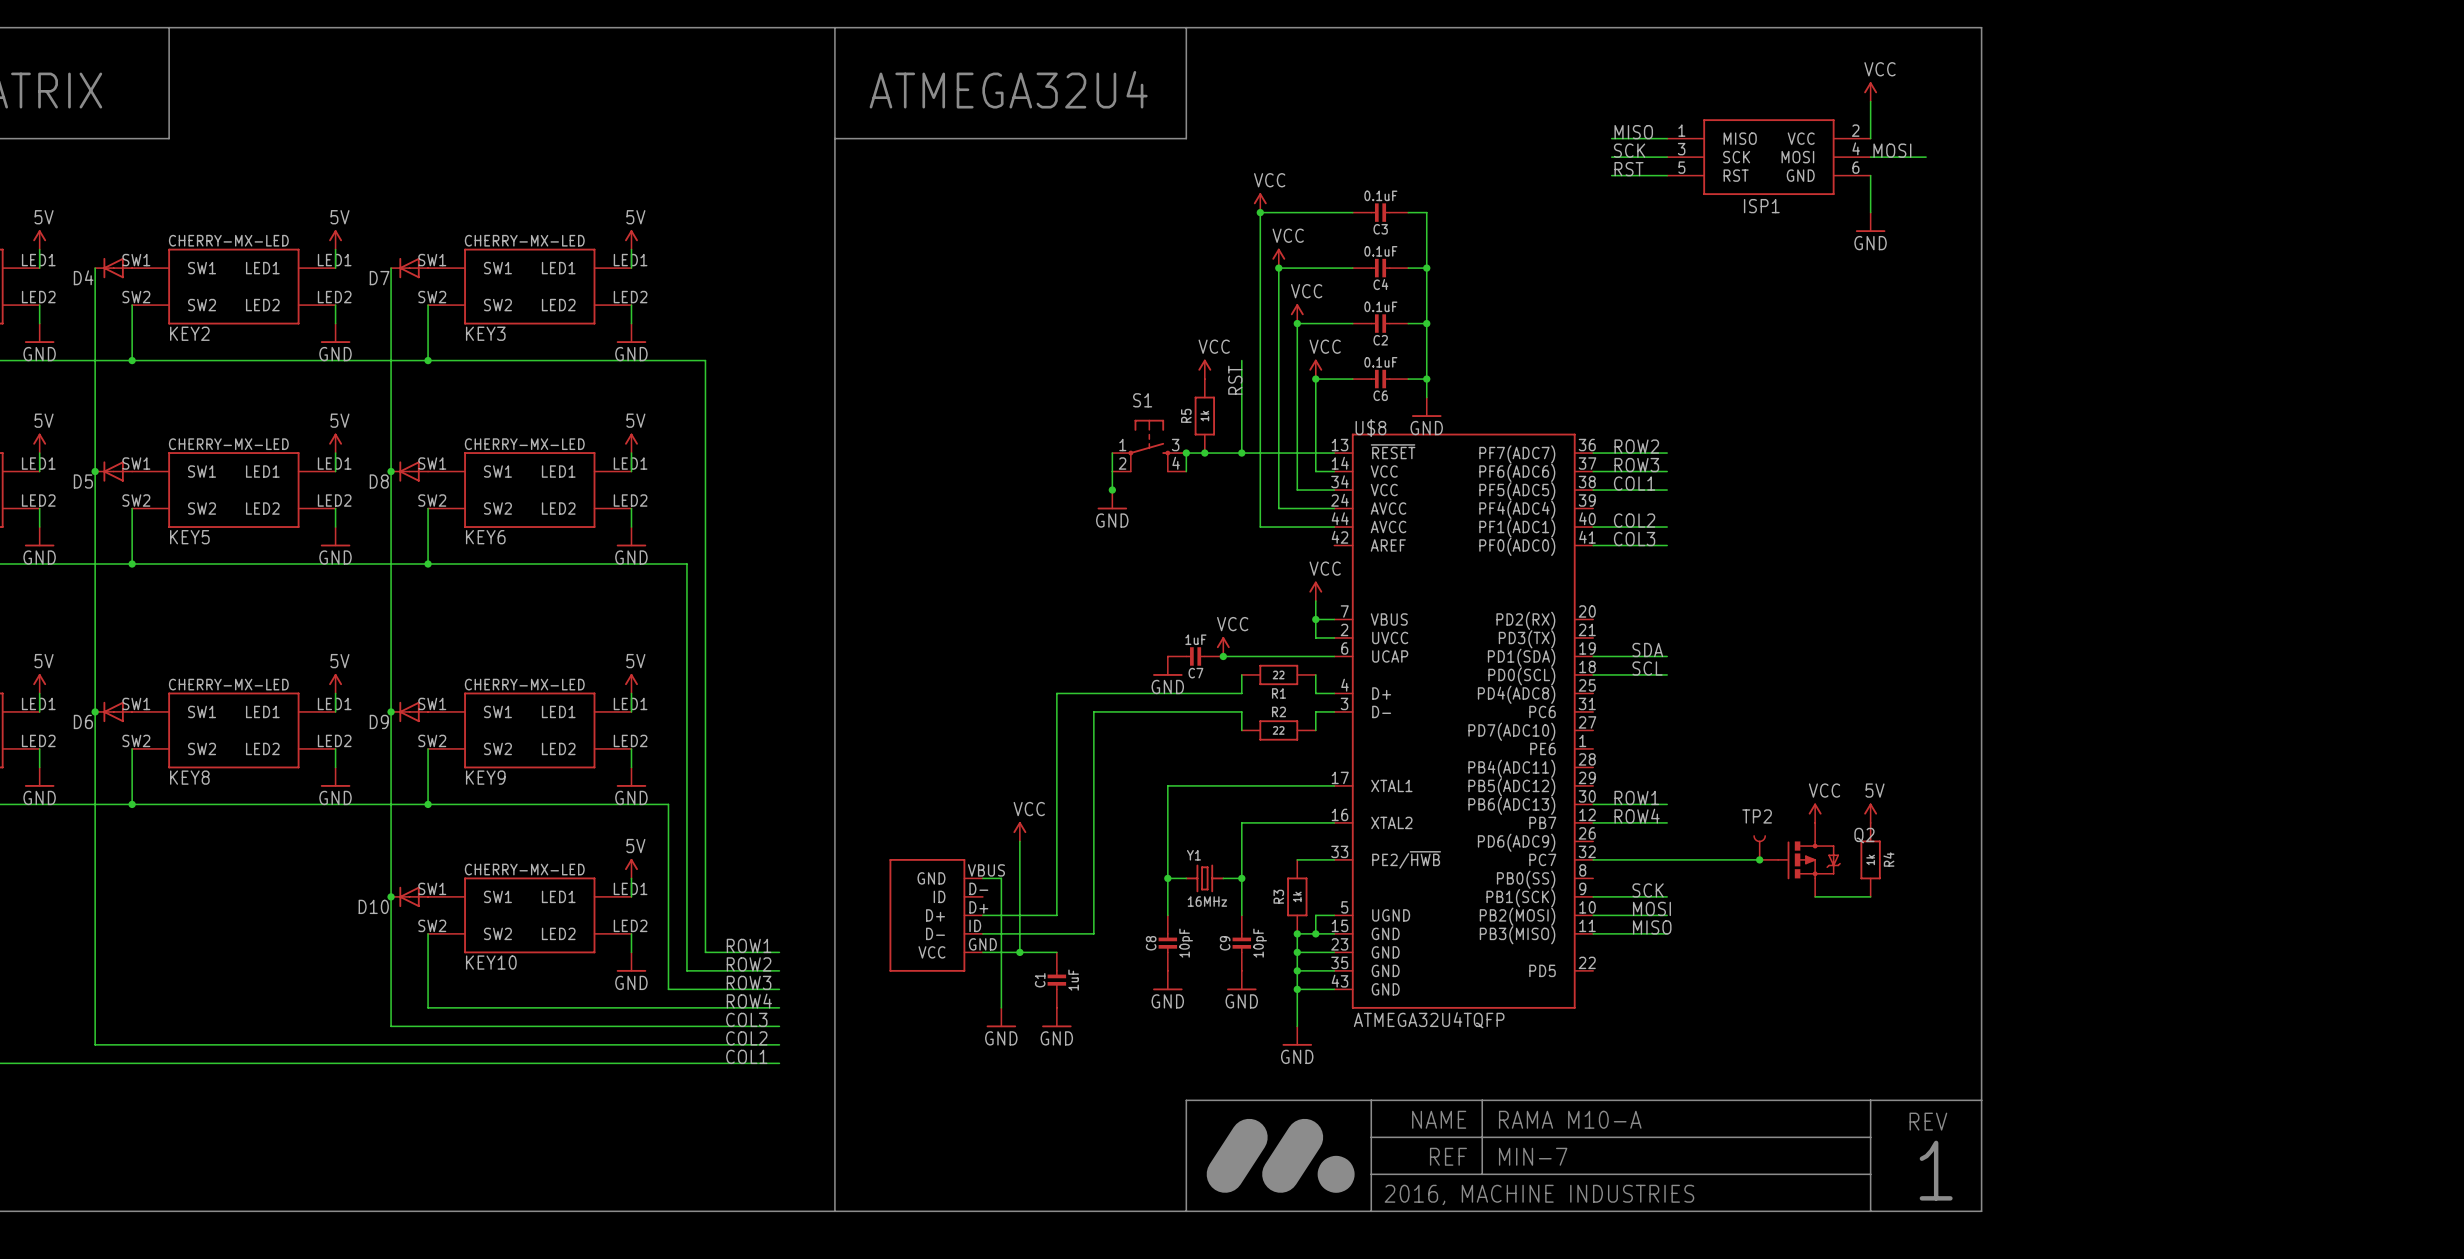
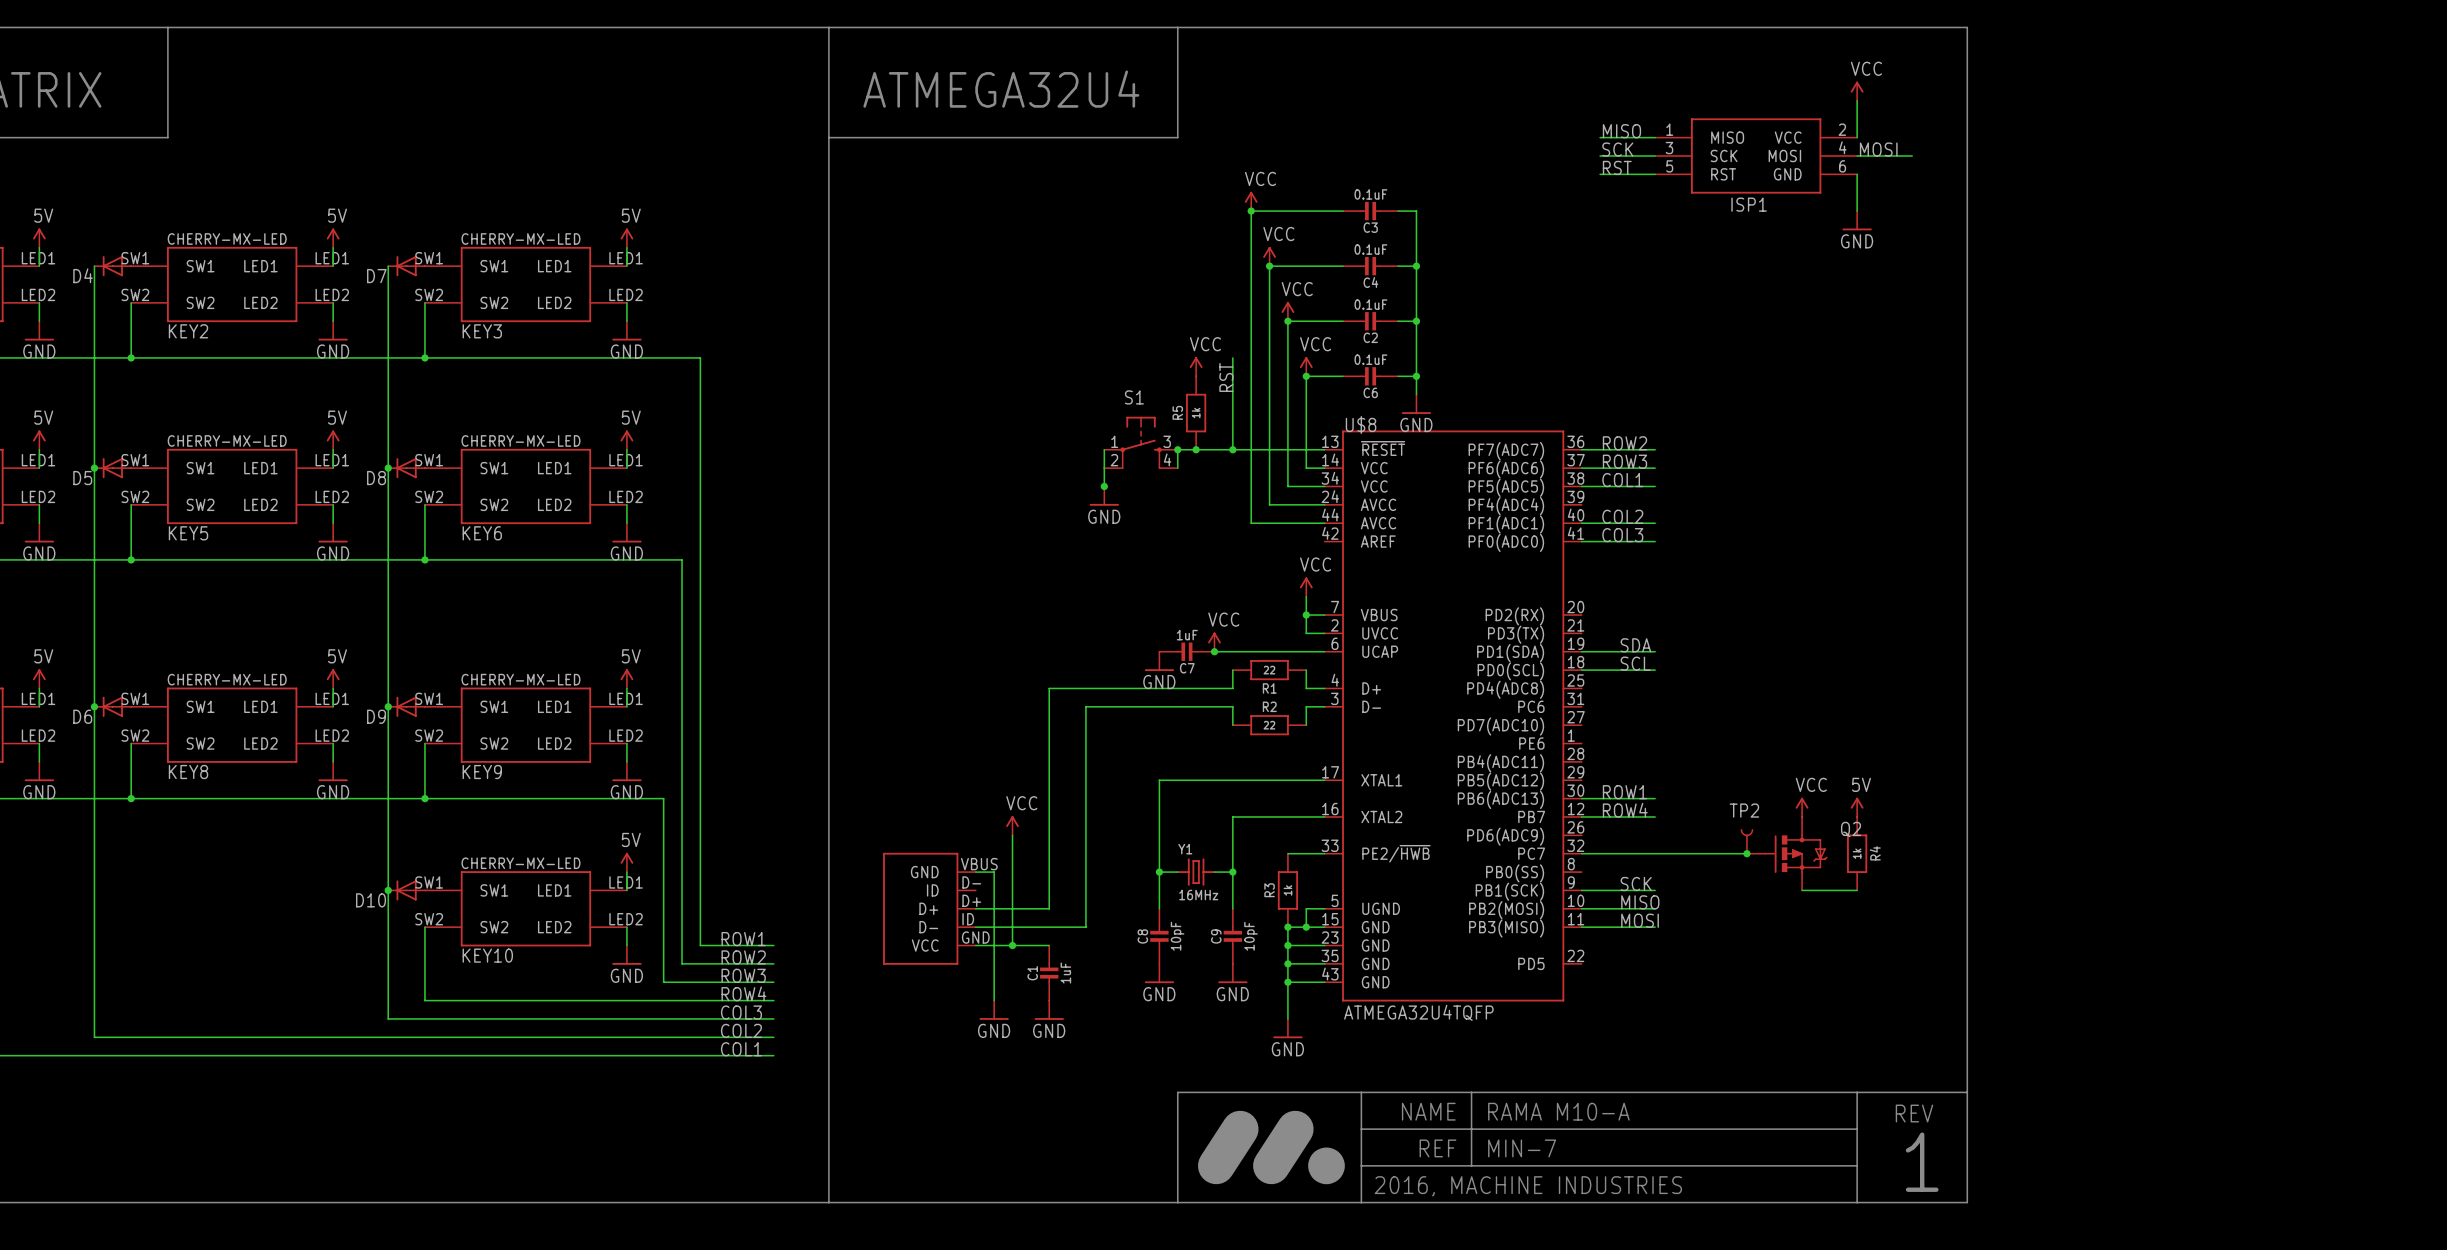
label: MOSI (1651, 908) -> MISO (1640, 902)
label: MISO (1652, 927) -> MOSI (1640, 920)

